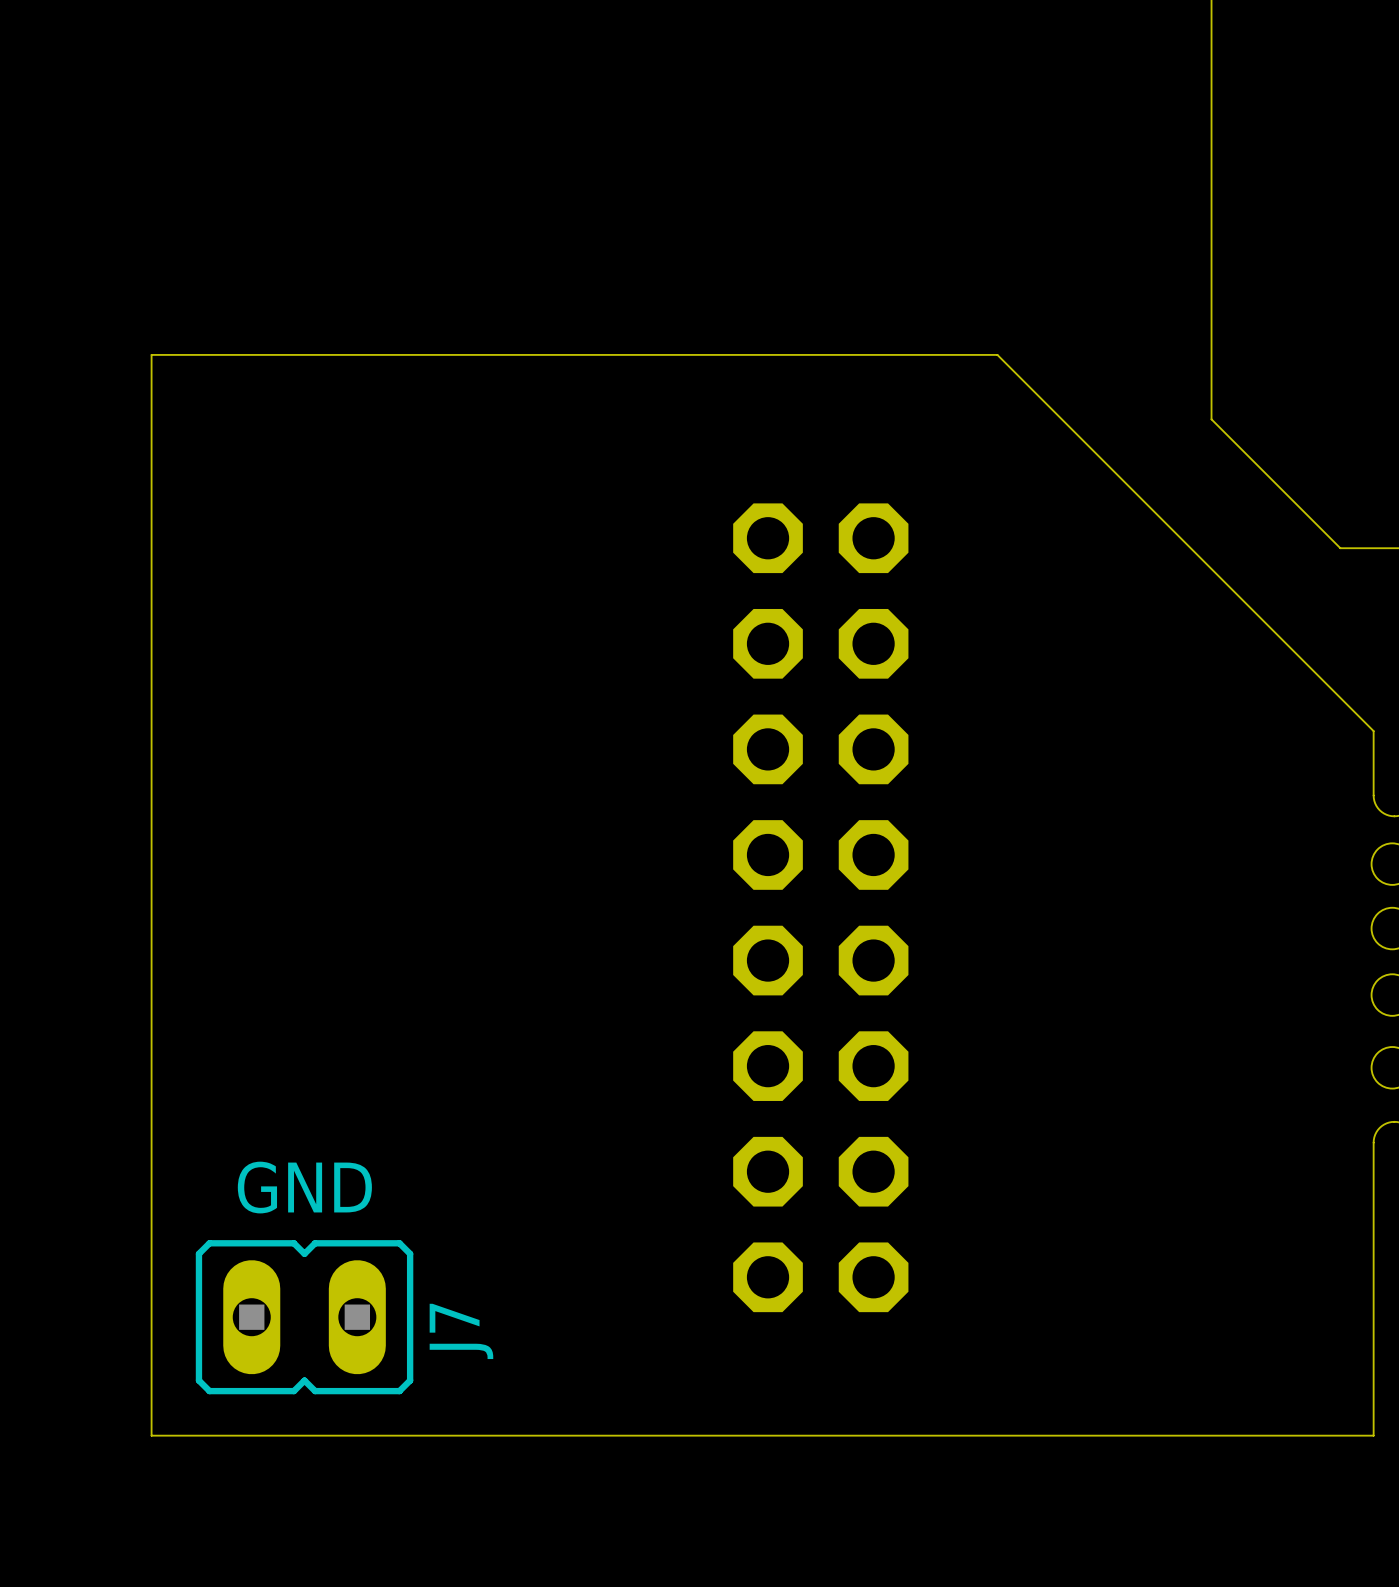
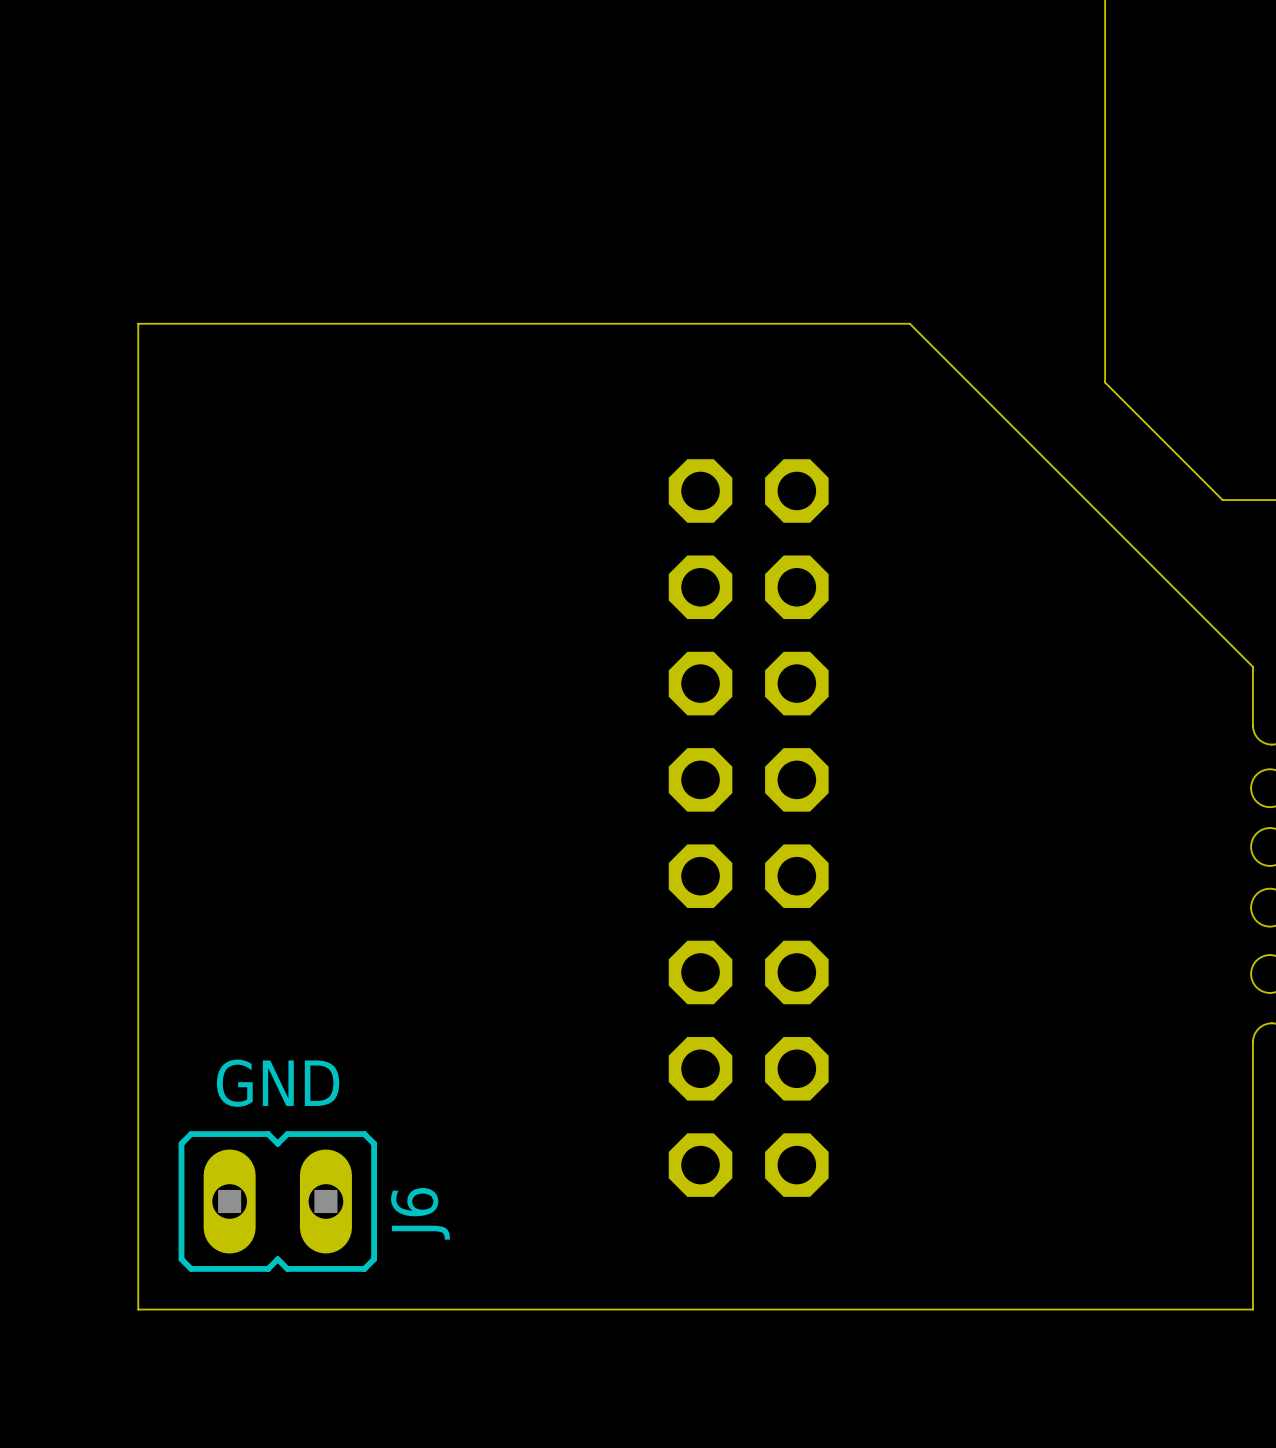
J7 name: J7 (461, 1331) -> J6 (420, 1213)

